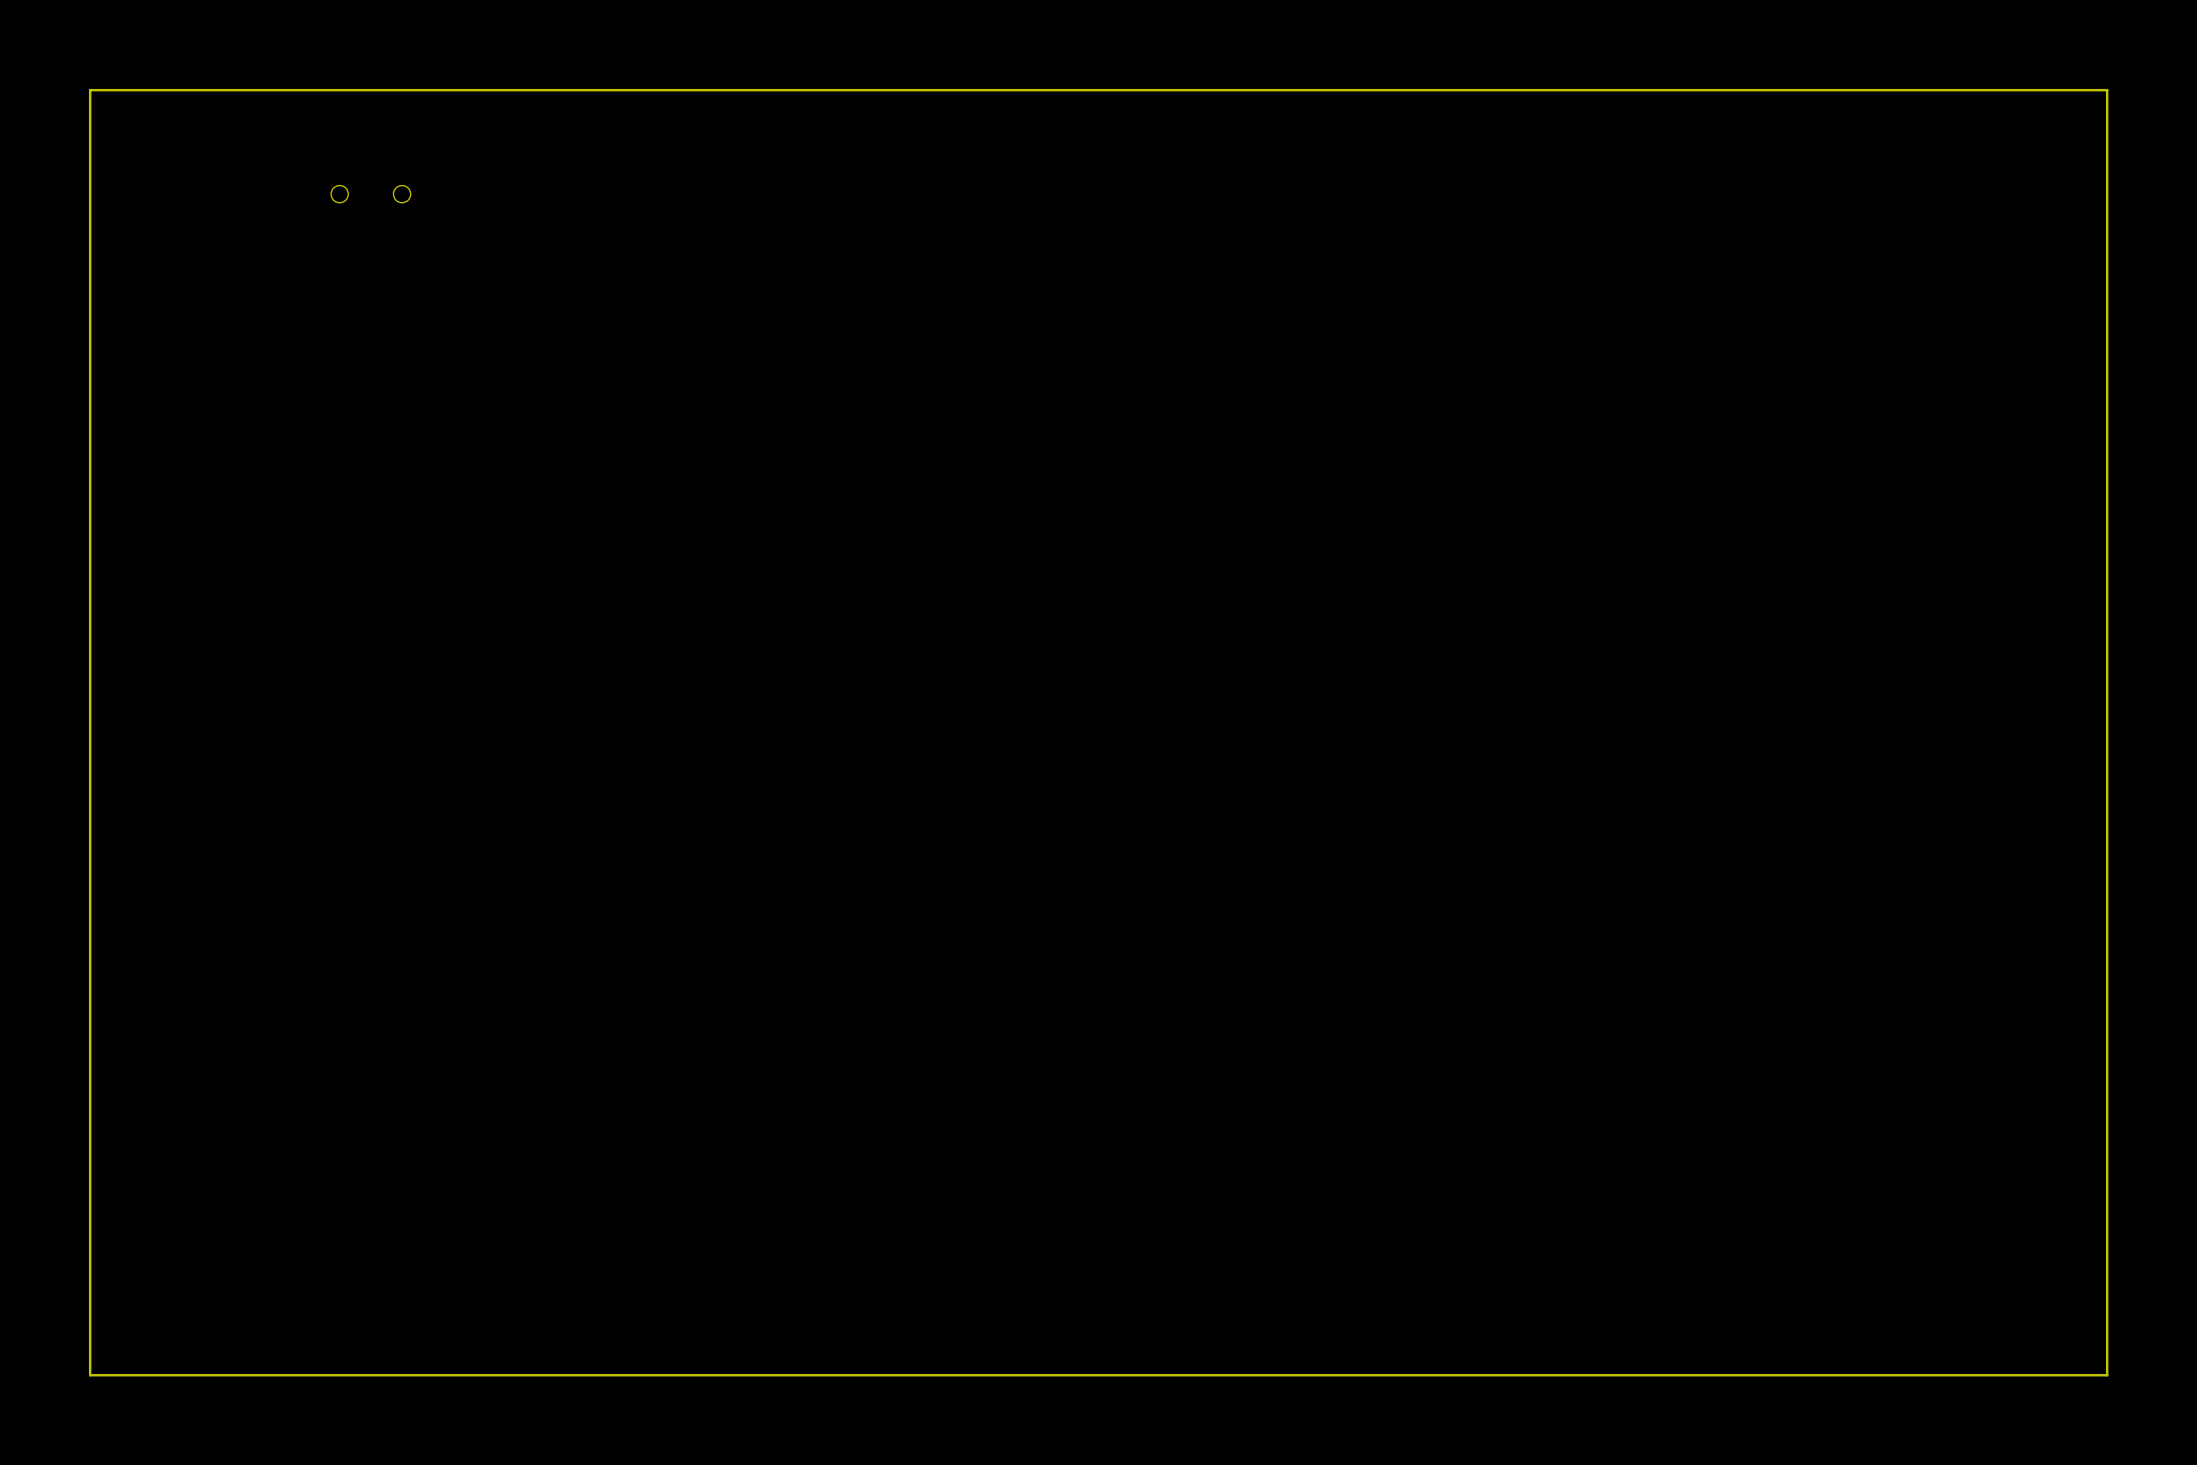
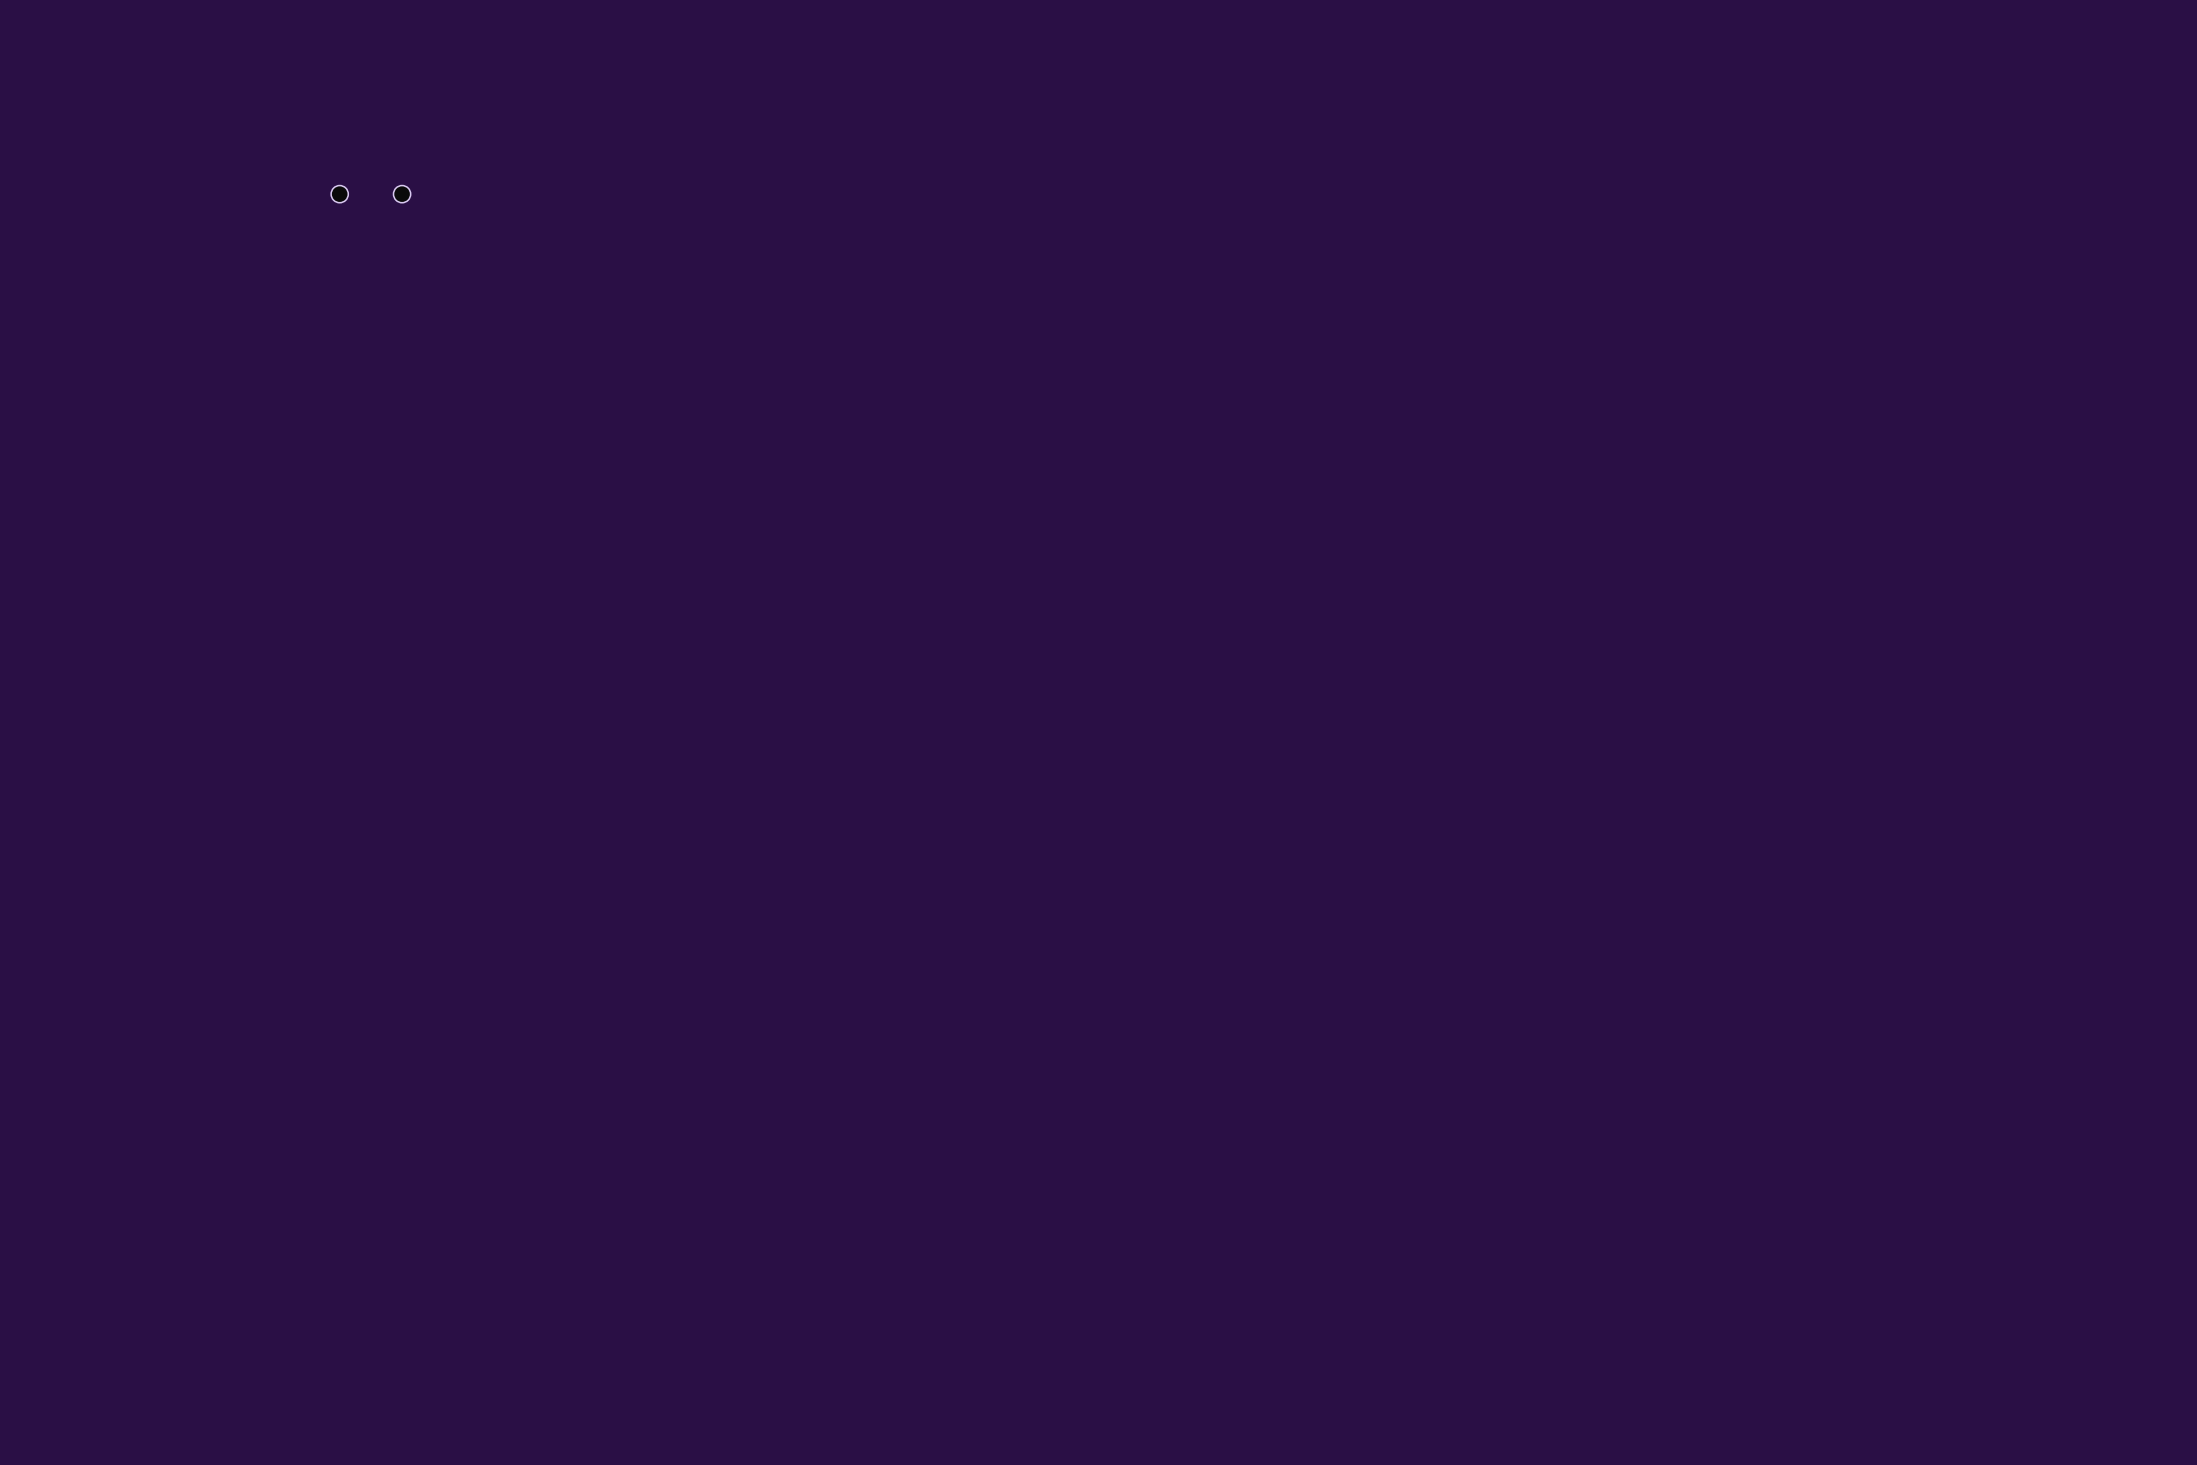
board edge: (2107, 90) (90, 90) (90, 1375) (2107, 1375) (2107, 90) -> none

